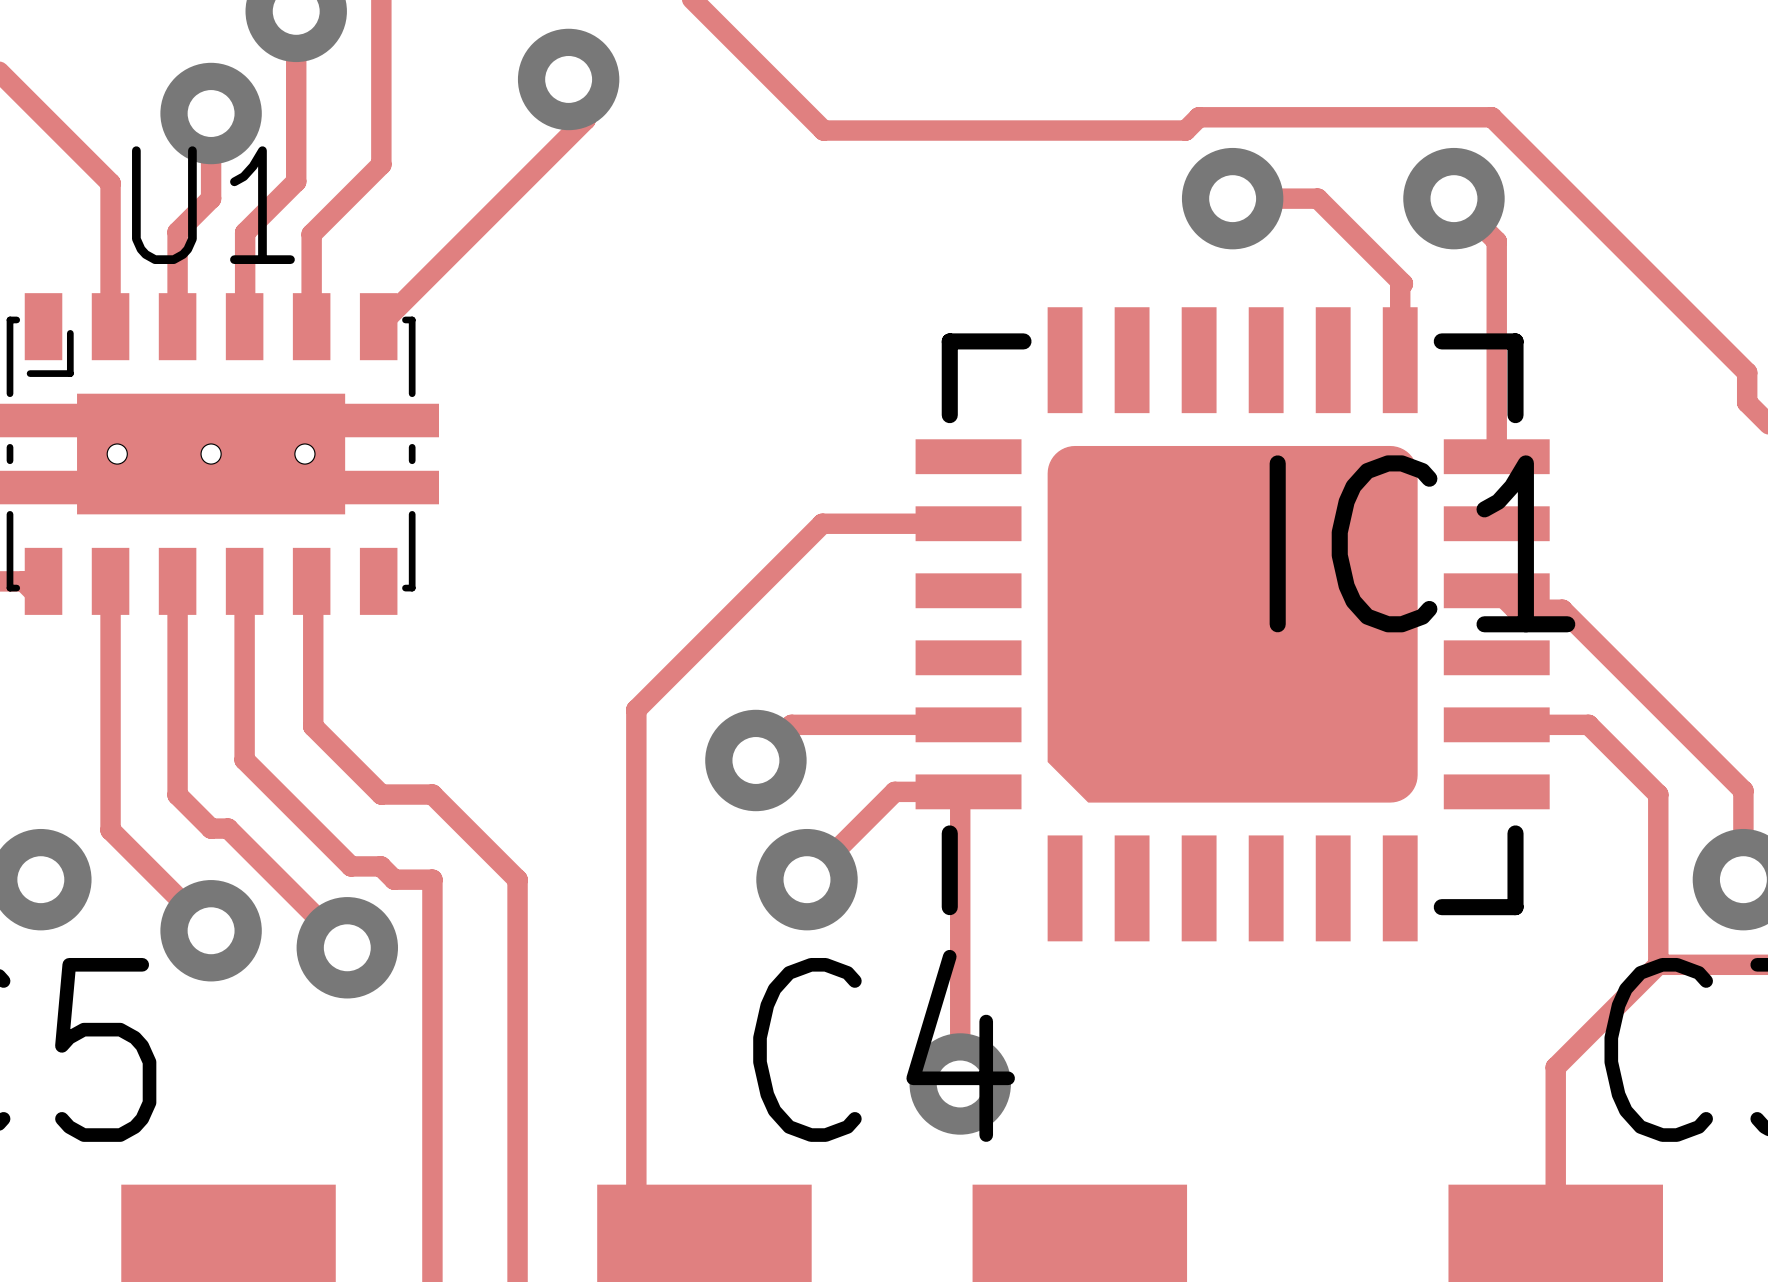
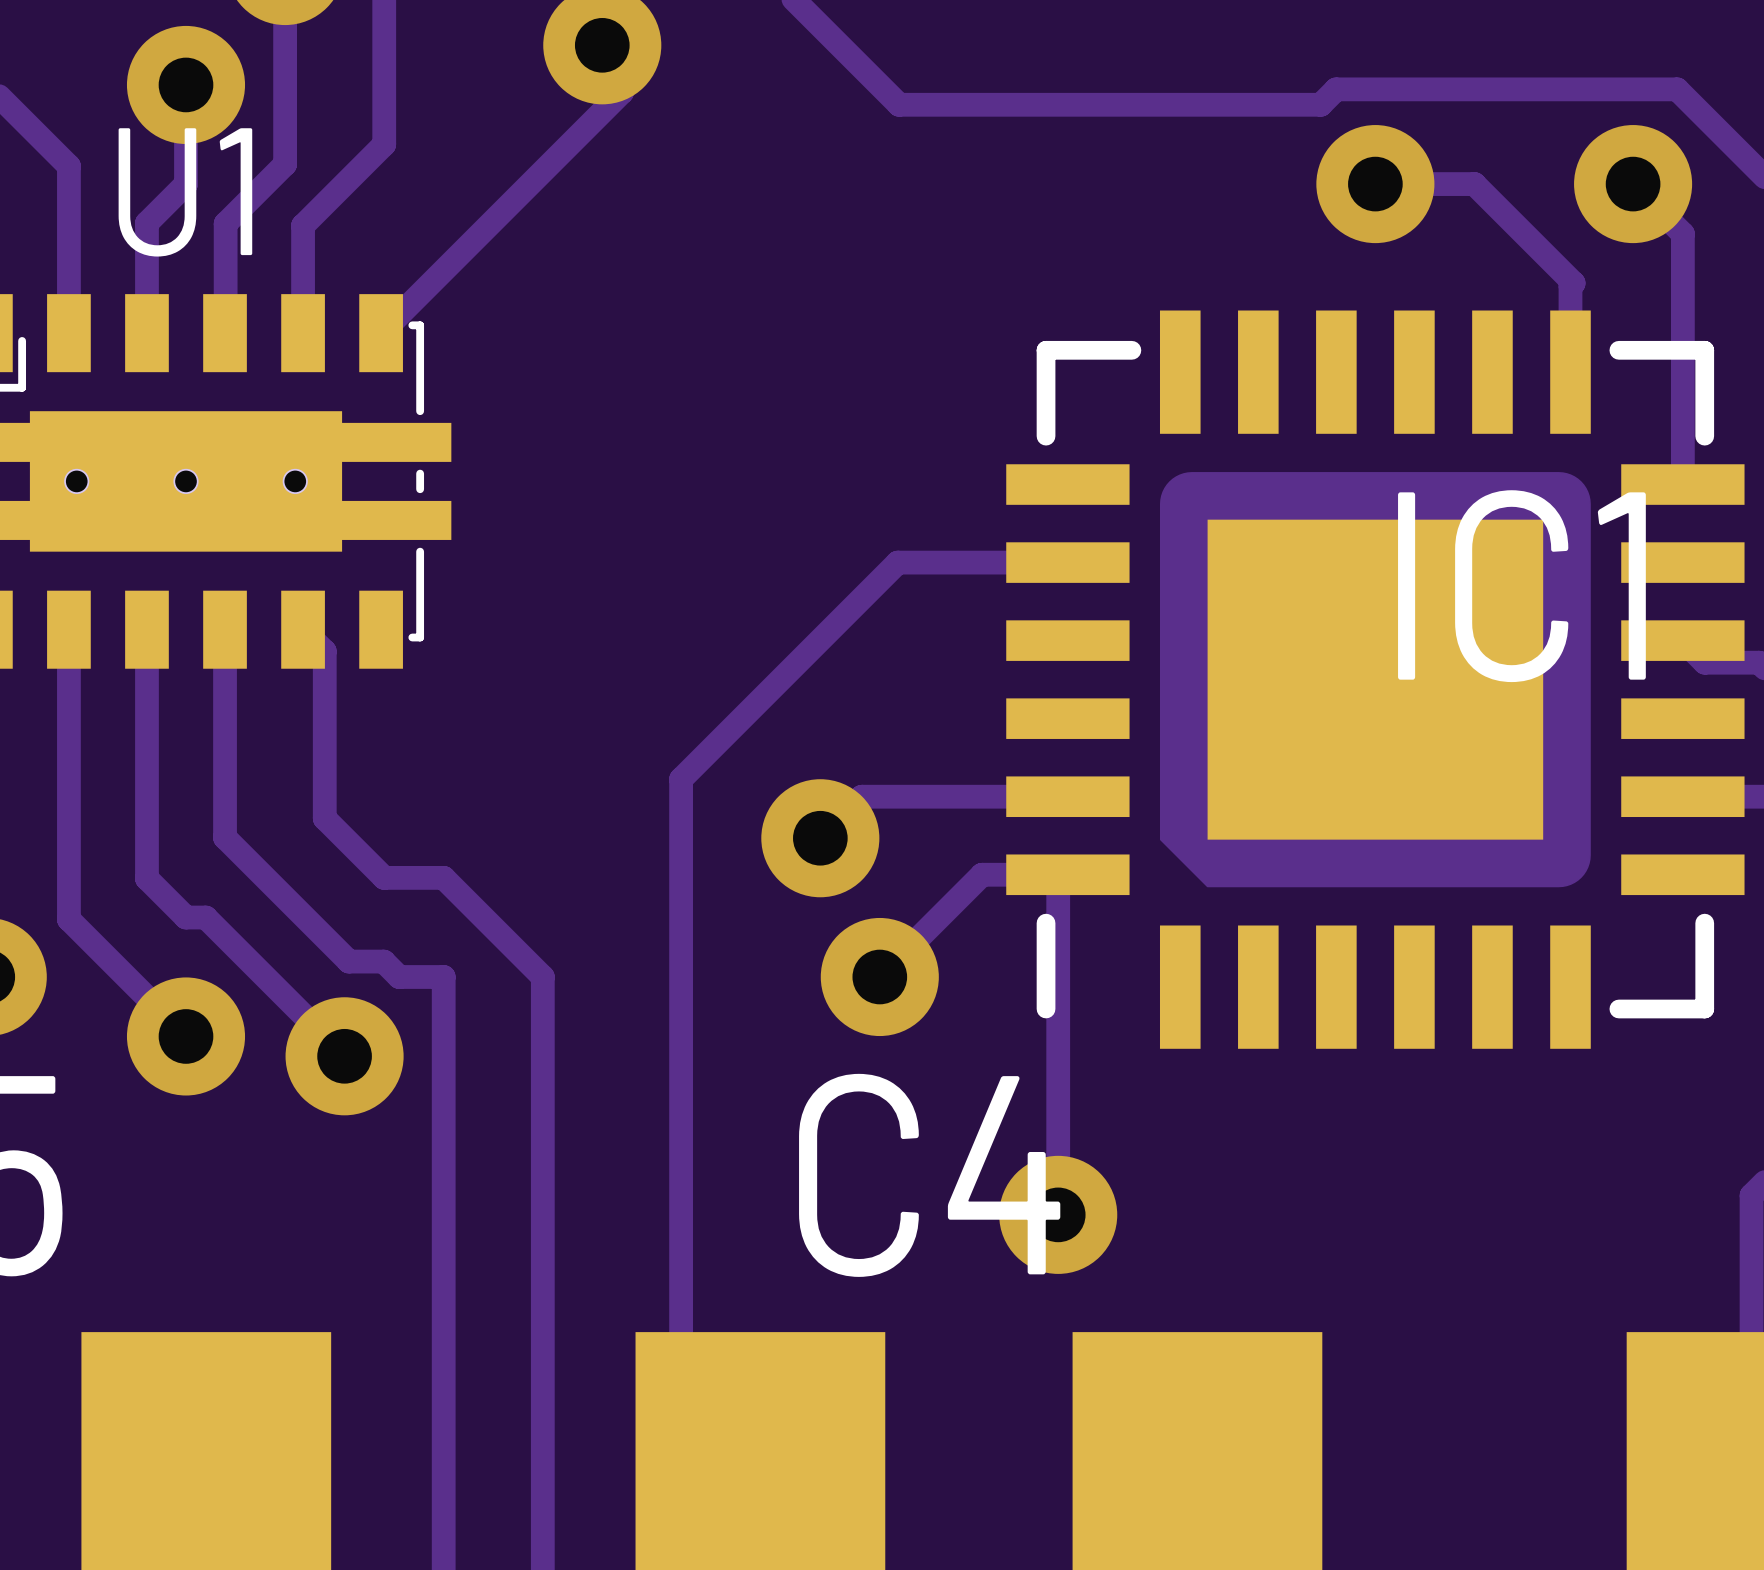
track: (313, 582) (313, 726) (330, 743) -> (304, 631) (324, 651) (324, 818)

